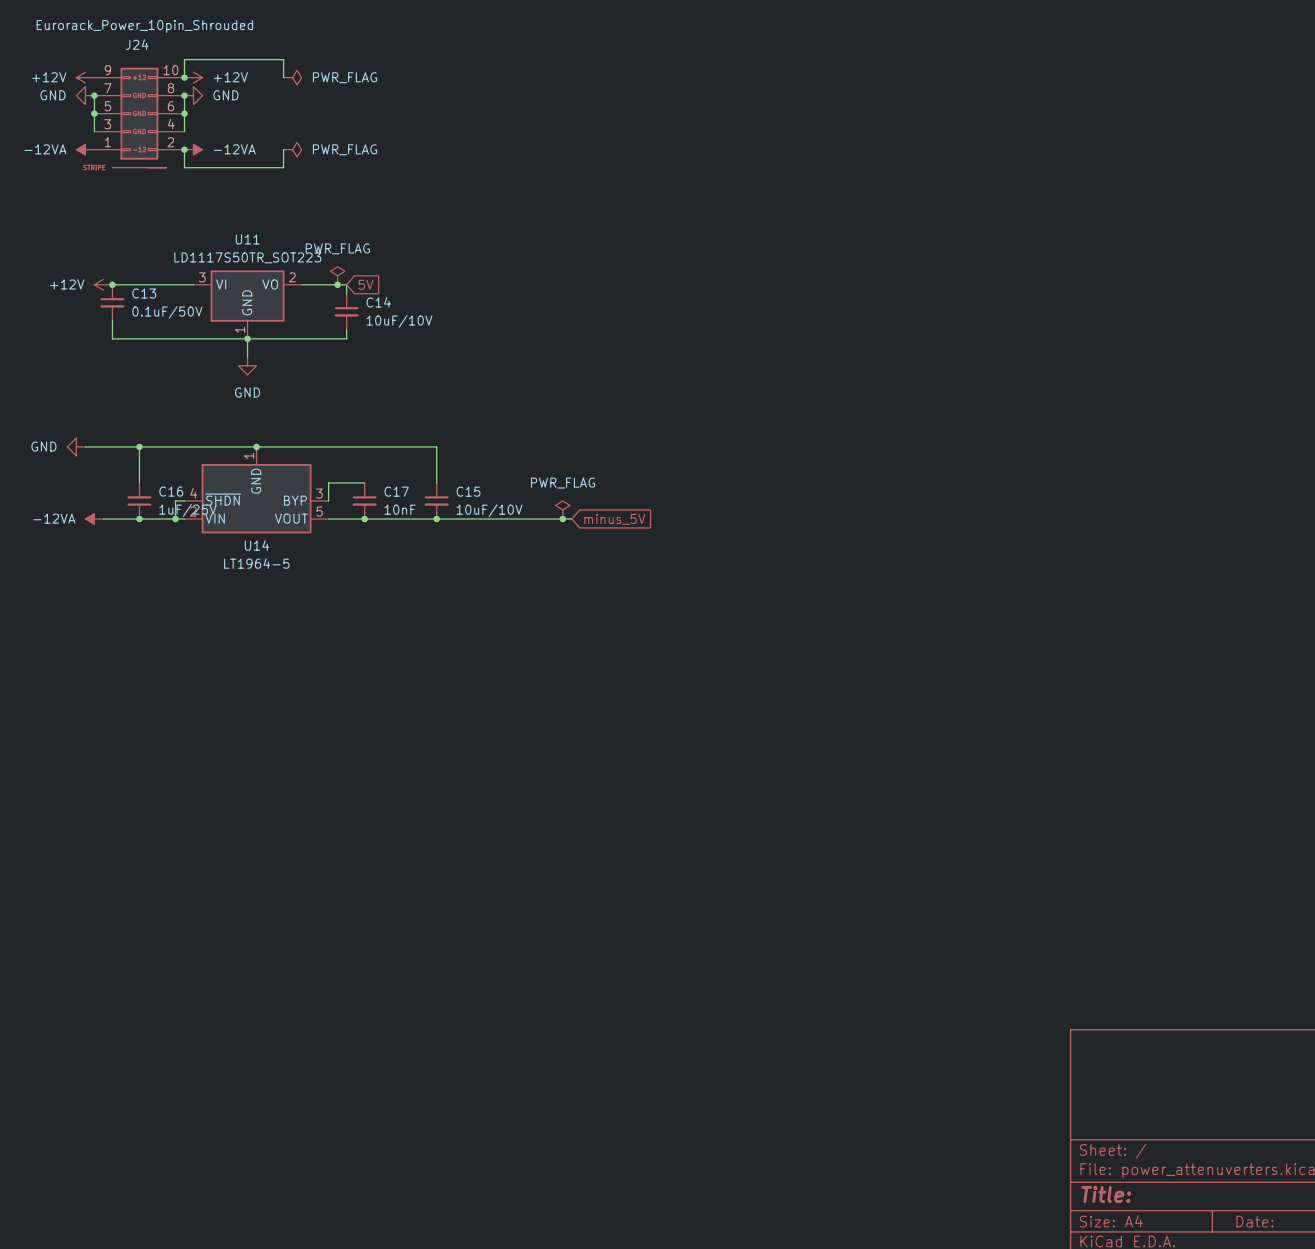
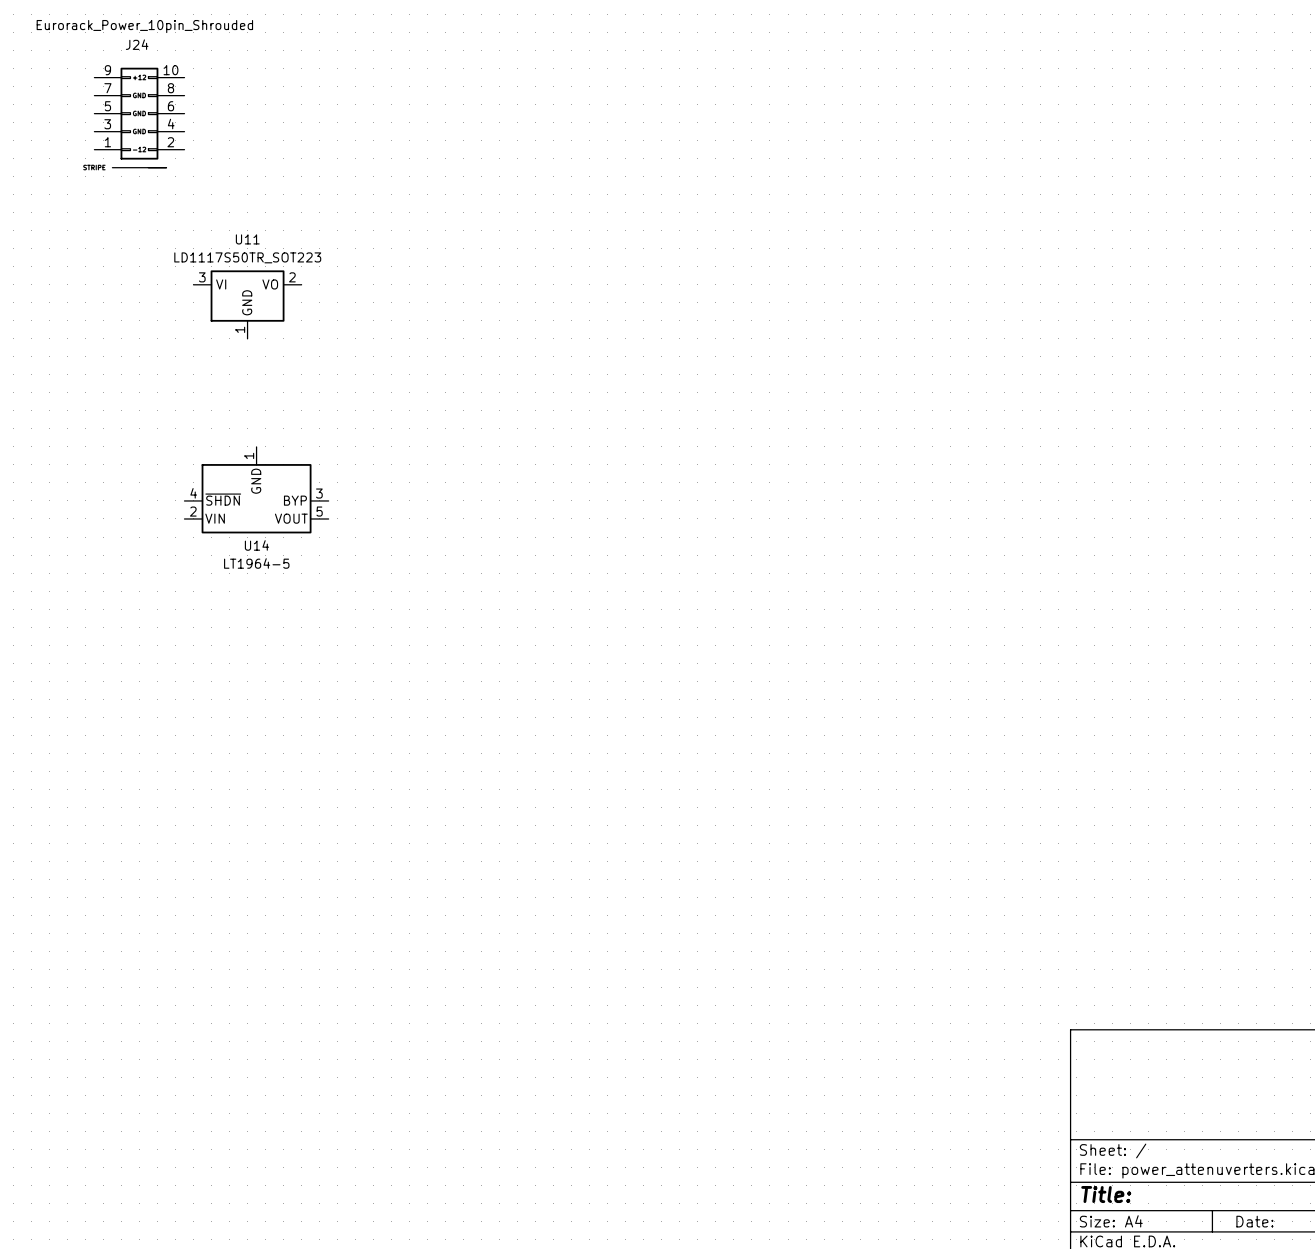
power symbol: +12V (85, 77) -> none
wire: (184, 77) (184, 59) (283, 59) (283, 77) -> none
junction: (184, 77) -> none
power symbol: +12V (193, 77) -> none
power symbol: PWR_FLAG (292, 77) -> none
power symbol: GND (85, 95) -> none
wire: (94, 95) (94, 131) -> none
junction: (94, 95) -> none
wire: (184, 95) (184, 131) -> none
junction: (184, 95) -> none
power symbol: GND (193, 95) -> none
junction: (94, 113) -> none
junction: (184, 113) -> none
power symbol: -12VA (85, 149) -> none
wire: (184, 149) (184, 167) (283, 167) (283, 149) -> none
junction: (184, 149) -> none
power symbol: -12VA (193, 149) -> none
power symbol: PWR_FLAG (292, 149) -> none
power symbol: PWR_FLAG (337, 275) -> none
power symbol: +12V (103, 284) -> none
wire: (112, 284) (193, 284) -> none
junction: (112, 284) -> none
wire: (301, 284) (346, 284) (346, 293) -> none
junction: (337, 284) -> none
global label: 5V (366, 284) -> none
C13: (112, 302) -> none
C14: (346, 311) -> none
wire: (112, 320) (112, 338) (346, 338) (346, 329) -> none
wire: (247, 338) (247, 356) -> none
junction: (247, 338) -> none
power symbol: GND (247, 365) -> none
power symbol: GND (76, 446) -> none
wire: (85, 446) (436, 446) (436, 482) -> none
wire: (139, 446) (139, 482) -> none
junction: (139, 446) -> none
junction: (256, 446) -> none
wire: (364, 482) (328, 482) (328, 500) -> none
C16: (139, 500) -> none
wire: (184, 500) (175, 500) (175, 518) -> none
C17: (364, 500) -> none
C15: (436, 500) -> none
power symbol: PWR_FLAG (562, 509) -> none
power symbol: -12VA (94, 518) -> none
wire: (103, 518) (184, 518) -> none
junction: (139, 518) -> none
junction: (175, 518) -> none
wire: (328, 518) (571, 518) -> none
junction: (364, 518) -> none
junction: (436, 518) -> none
junction: (562, 518) -> none
global label: minus_5V (614, 519) -> none

